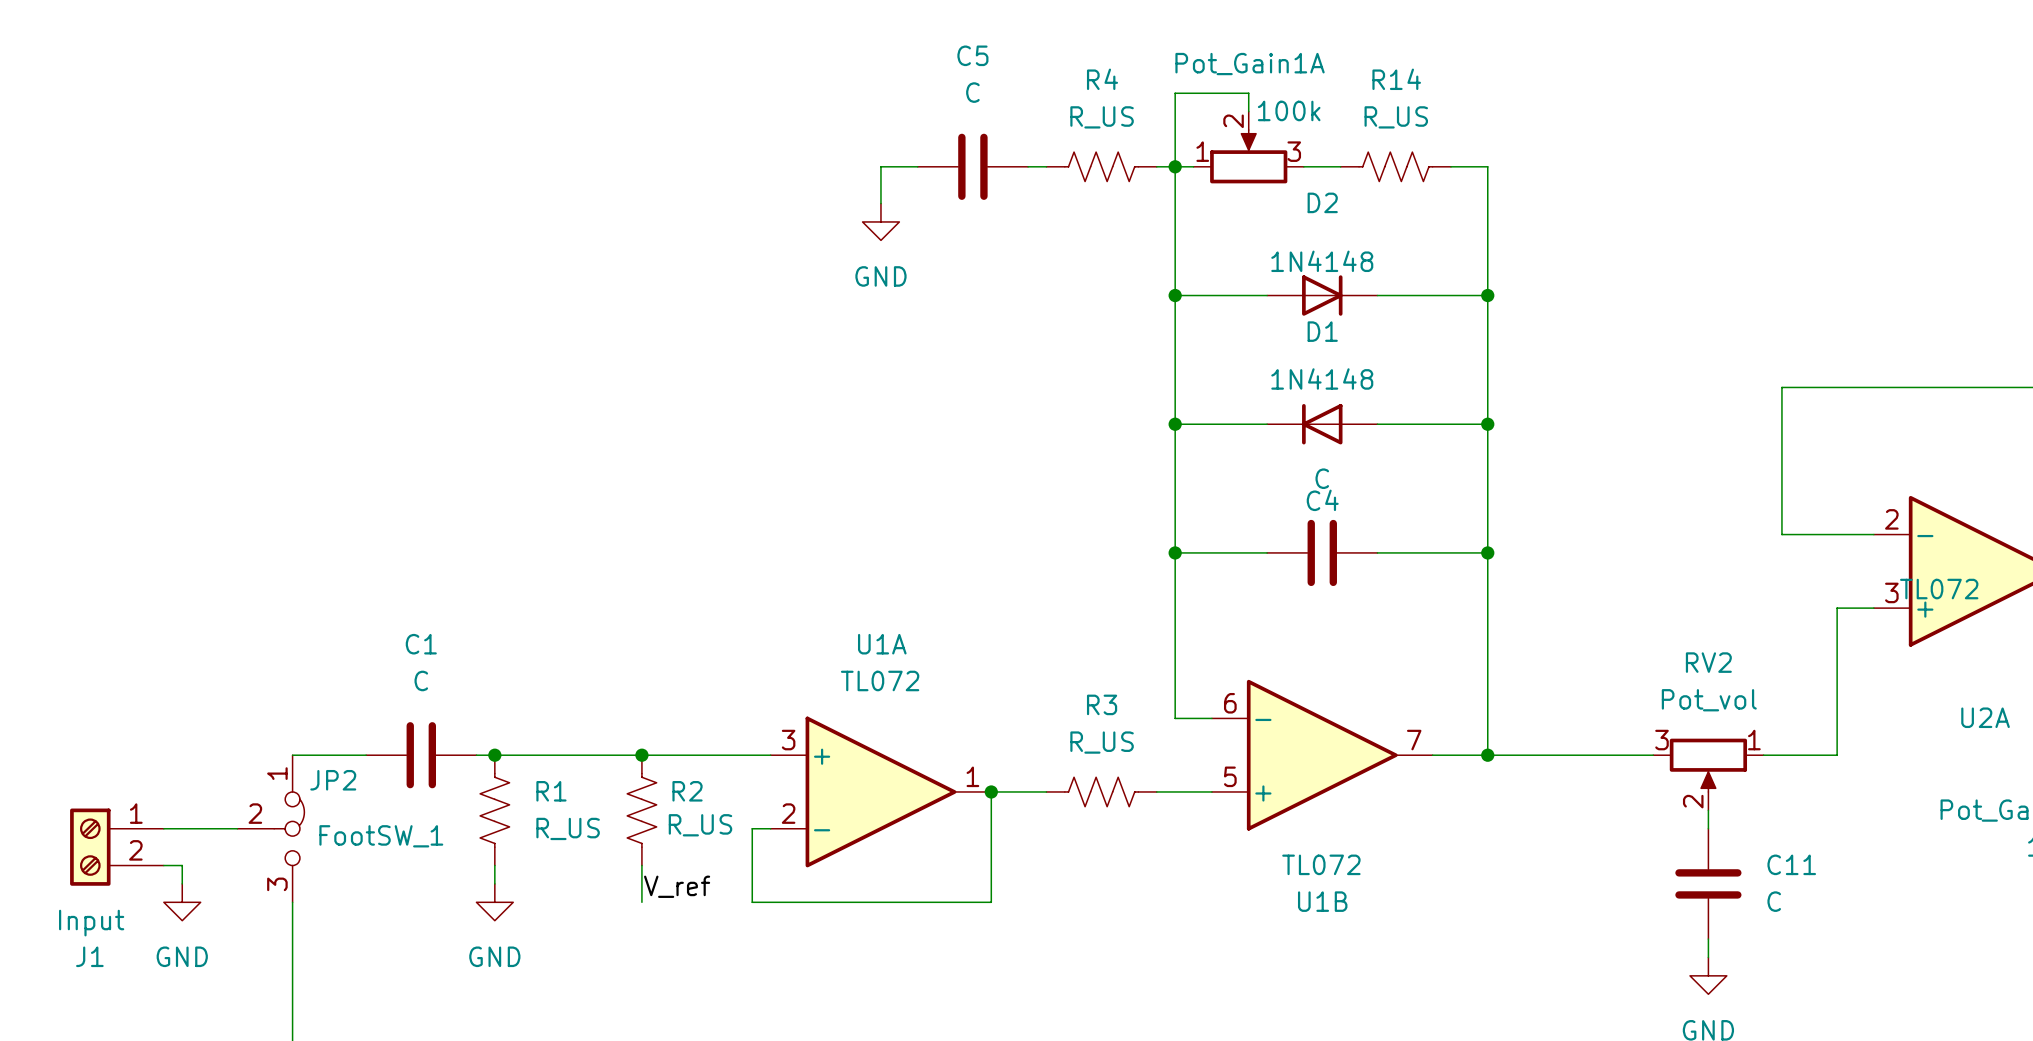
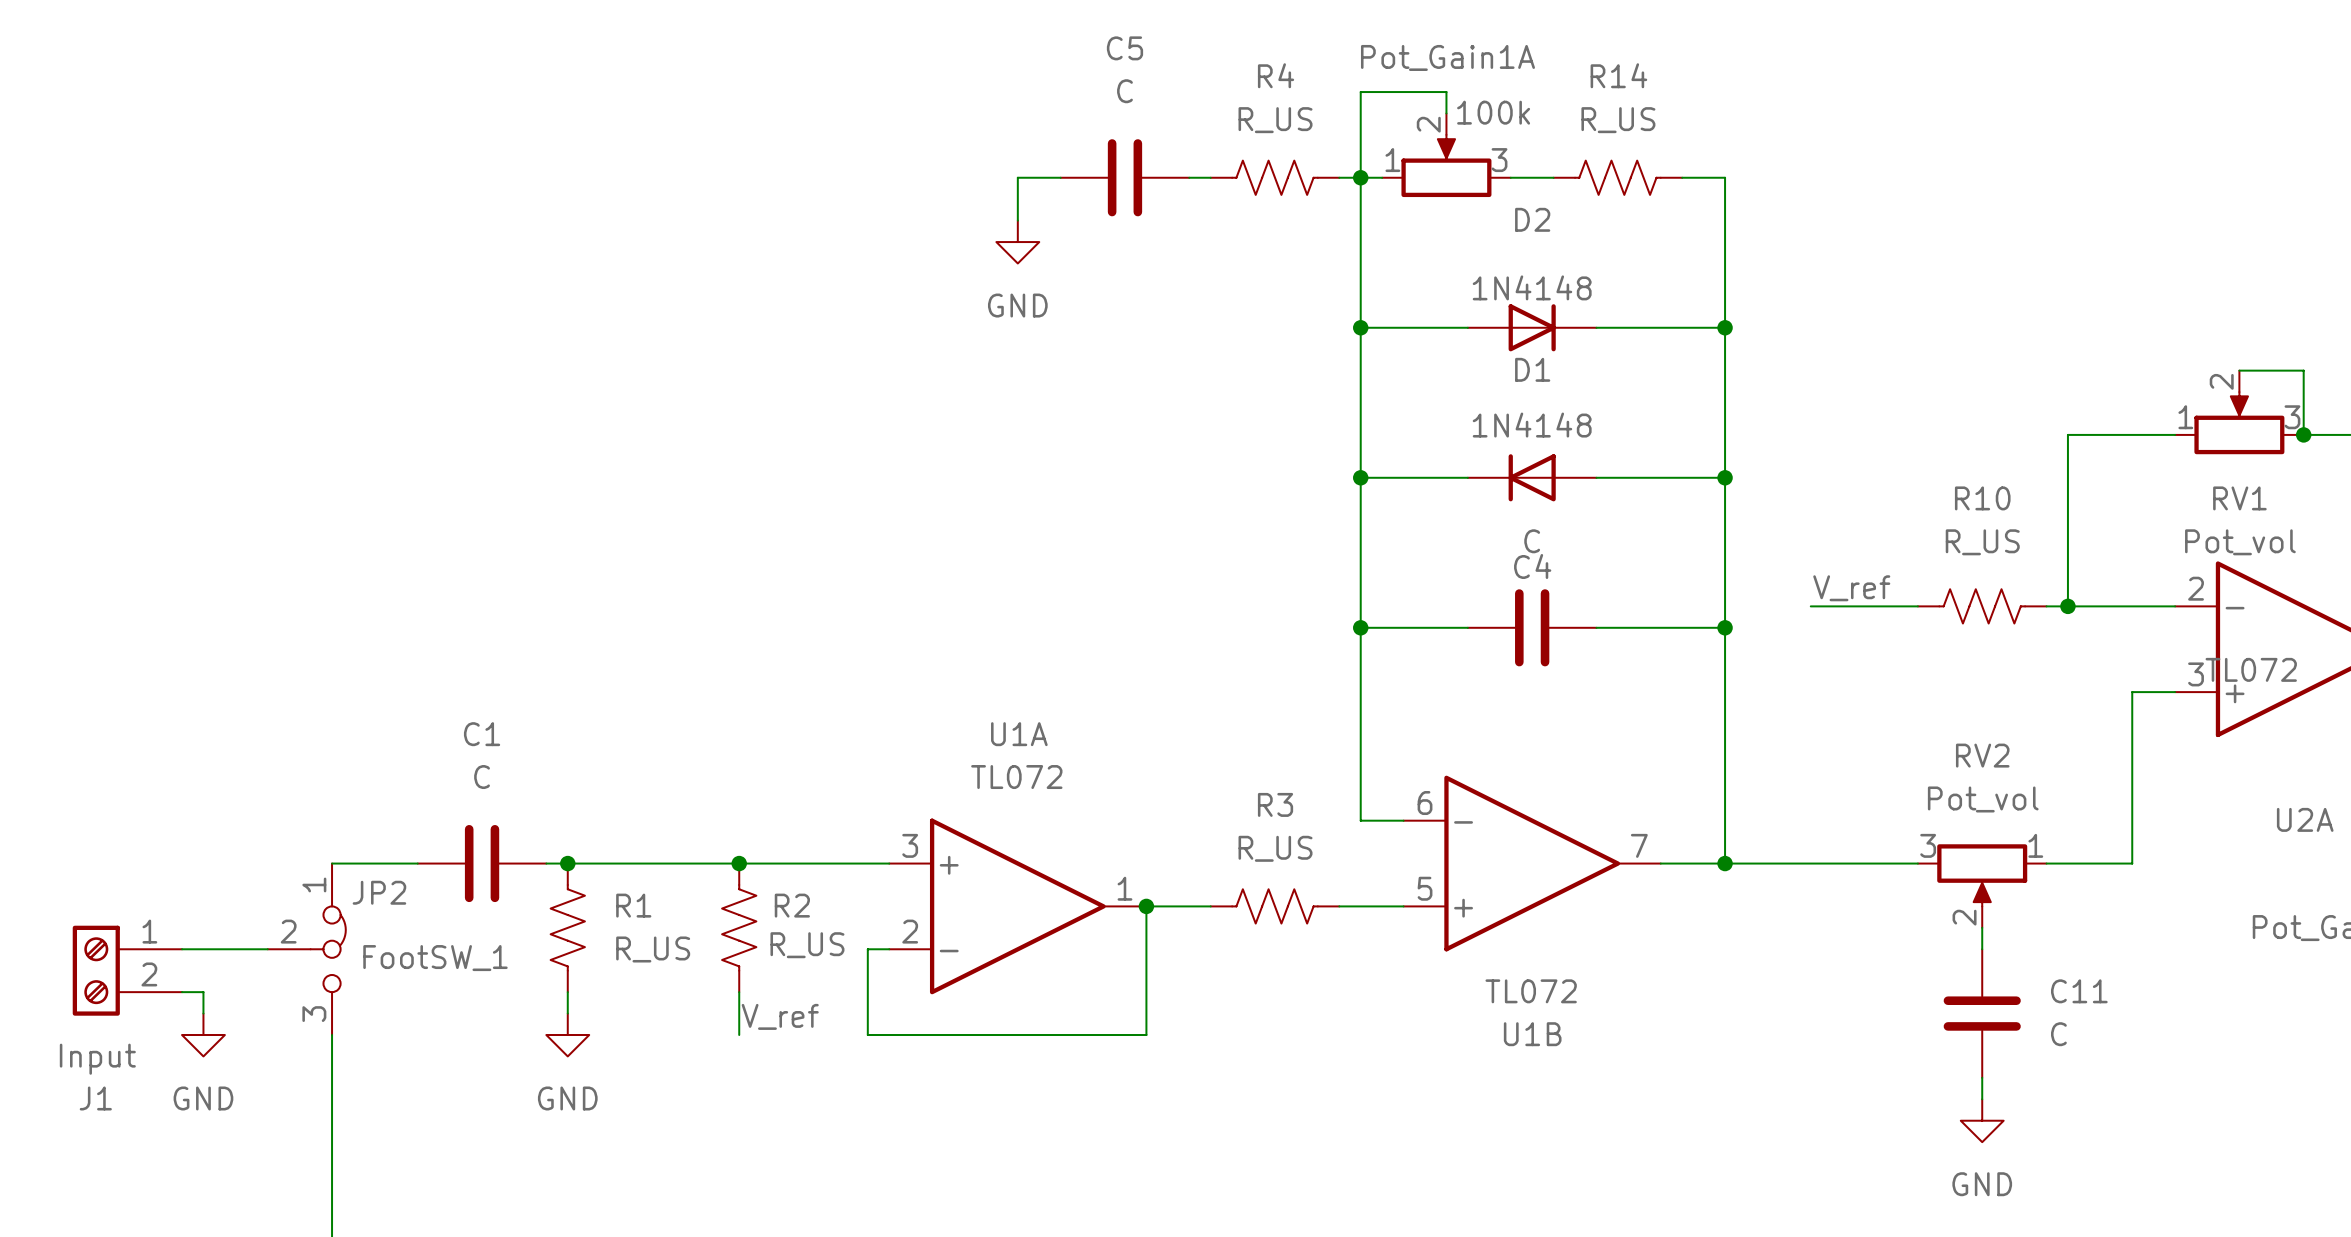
RV1: none -> Pot_vol (2239, 412)
wire: (1873, 387) (1984, 387) -> (2239, 370) (2303, 370) (2303, 434)
junction: none -> (2303, 434)
label: none -> V_ref (1851, 588)
wire: none -> (1810, 606) (1917, 606)
R10: none -> R_US (1982, 606)
wire: none -> (2046, 606) (2067, 606)
junction: none -> (2067, 606)

